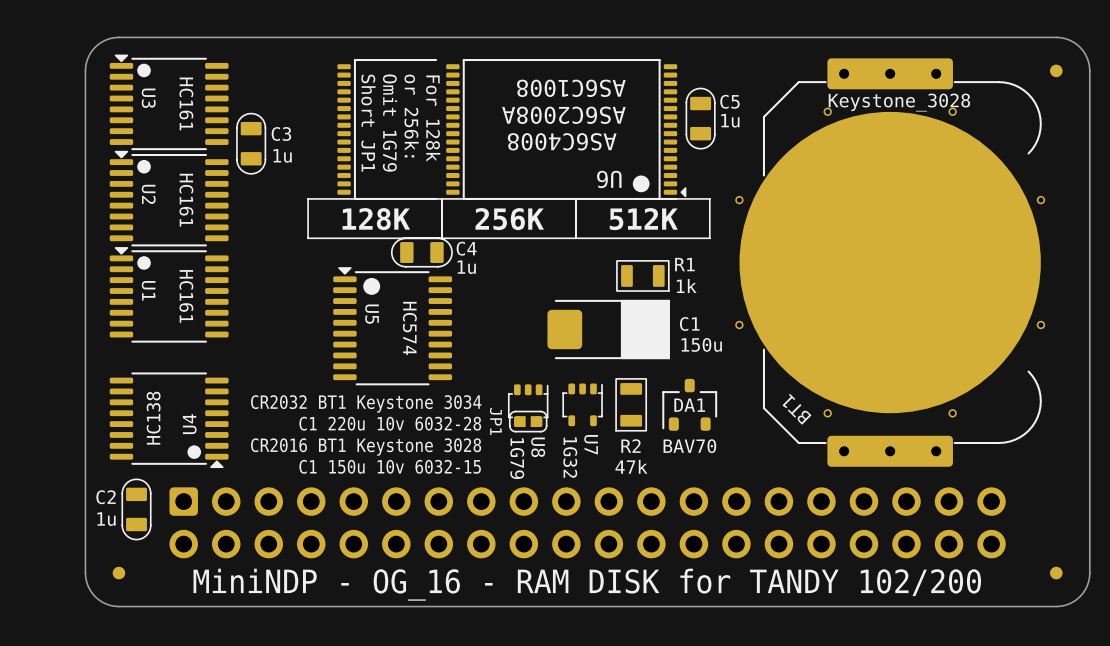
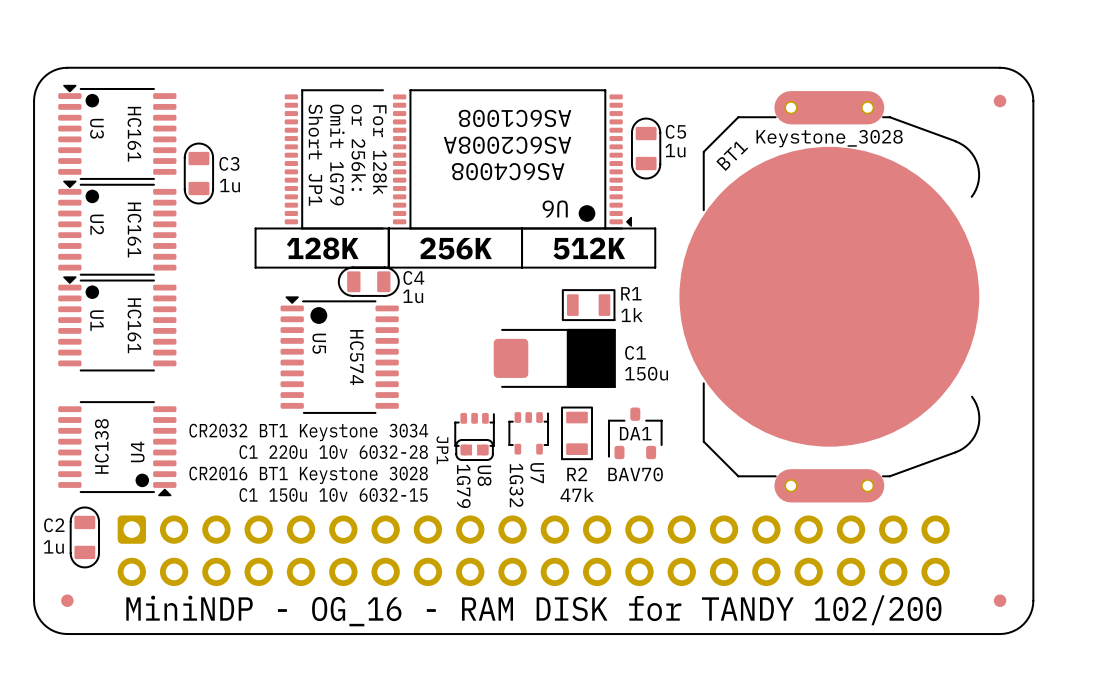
BT1 footprint: [735, 58, 1046, 467] -> [679, 91, 981, 503]
part: none -> (791, 107)
part: none -> (867, 107)
BT1 name position: BT1 (796, 409) -> BT1 (732, 156)
part: none -> (791, 485)
part: none -> (867, 485)

